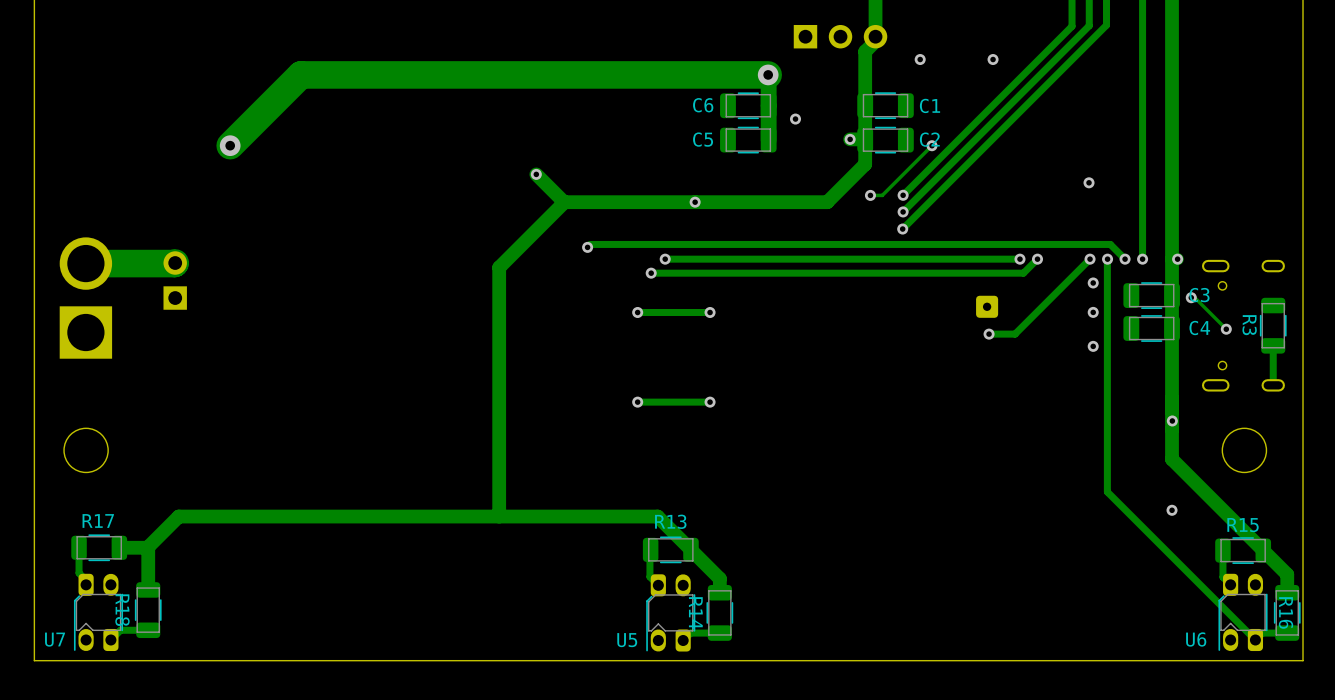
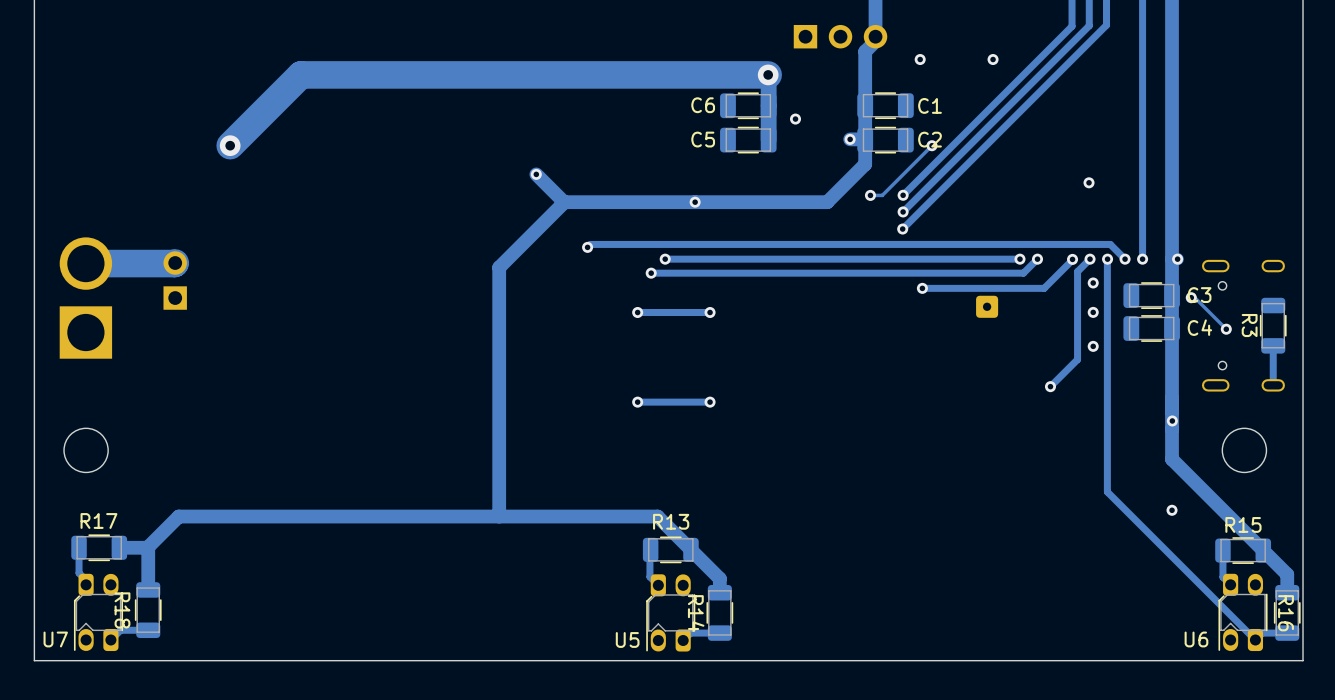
track: none -> (1072, 259) (1044, 288) (922, 288)
via: none -> (1072, 259)
track: (1077, 271) (1015, 334) (989, 334) -> (1077, 271) (1077, 359) (1050, 386)
via: none -> (922, 288)
via: (989, 334) -> none
via: none -> (1050, 386)

